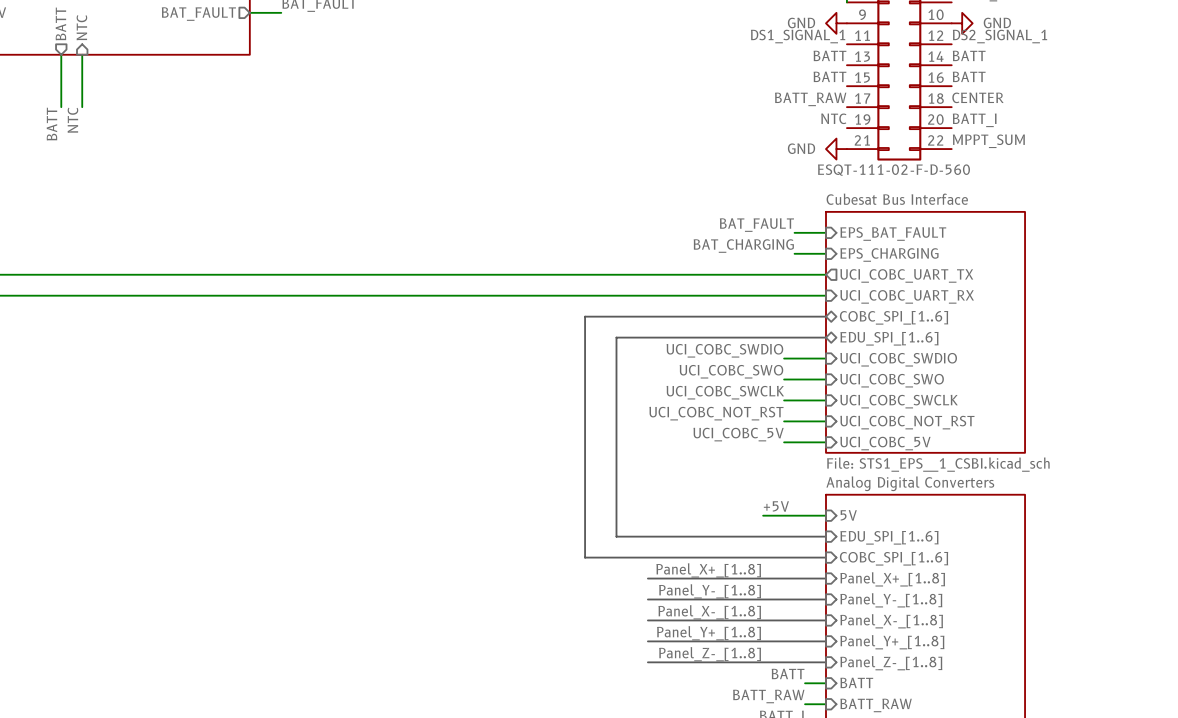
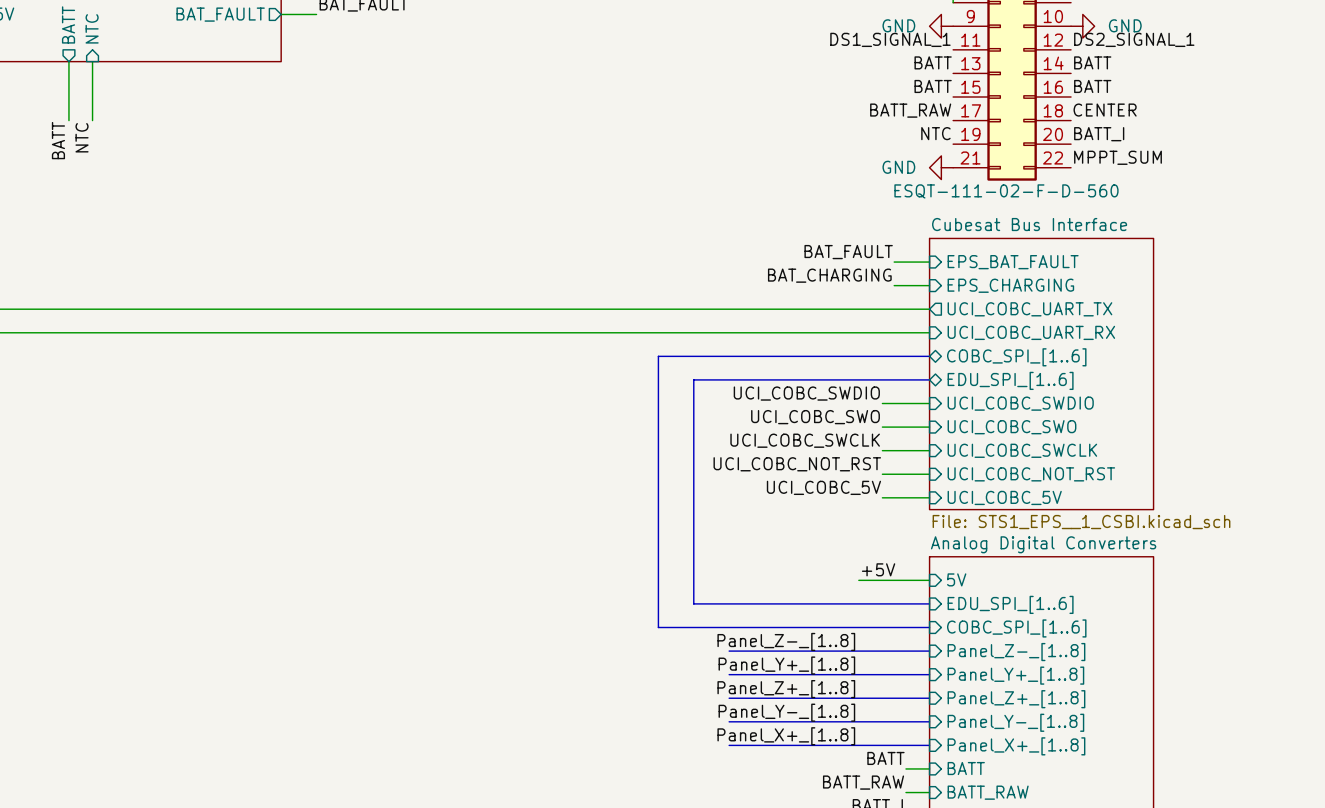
label: Panel_X+_[1..8] (708, 570) -> Panel_Z-_[1..8] (786, 641)
sheet pin: Panel_X+_[1..8] (892, 579) -> Panel_Z-_[1..8] (1016, 652)
label: Panel_Y-_[1..8] (710, 591) -> Panel_Y+_[1..8] (786, 665)
sheet pin: Panel_Y-_[1..8] (891, 600) -> Panel_Y+_[1..8] (1015, 675)
label: Panel_X-_[1..8] (709, 612) -> Panel_Z+_[1..8] (786, 689)
sheet pin: Panel_X-_[1..8] (891, 621) -> Panel_Z+_[1..8] (1016, 699)
label: Panel_Y+_[1..8] (709, 633) -> Panel_Y-_[1..8] (786, 712)
sheet pin: Panel_Y+_[1..8] (892, 642) -> Panel_Y-_[1..8] (1015, 722)
label: Panel_Z-_[1..8] (710, 654) -> Panel_X+_[1..8] (786, 736)
sheet pin: Panel_Z-_[1..8] (891, 663) -> Panel_X+_[1..8] (1016, 746)

